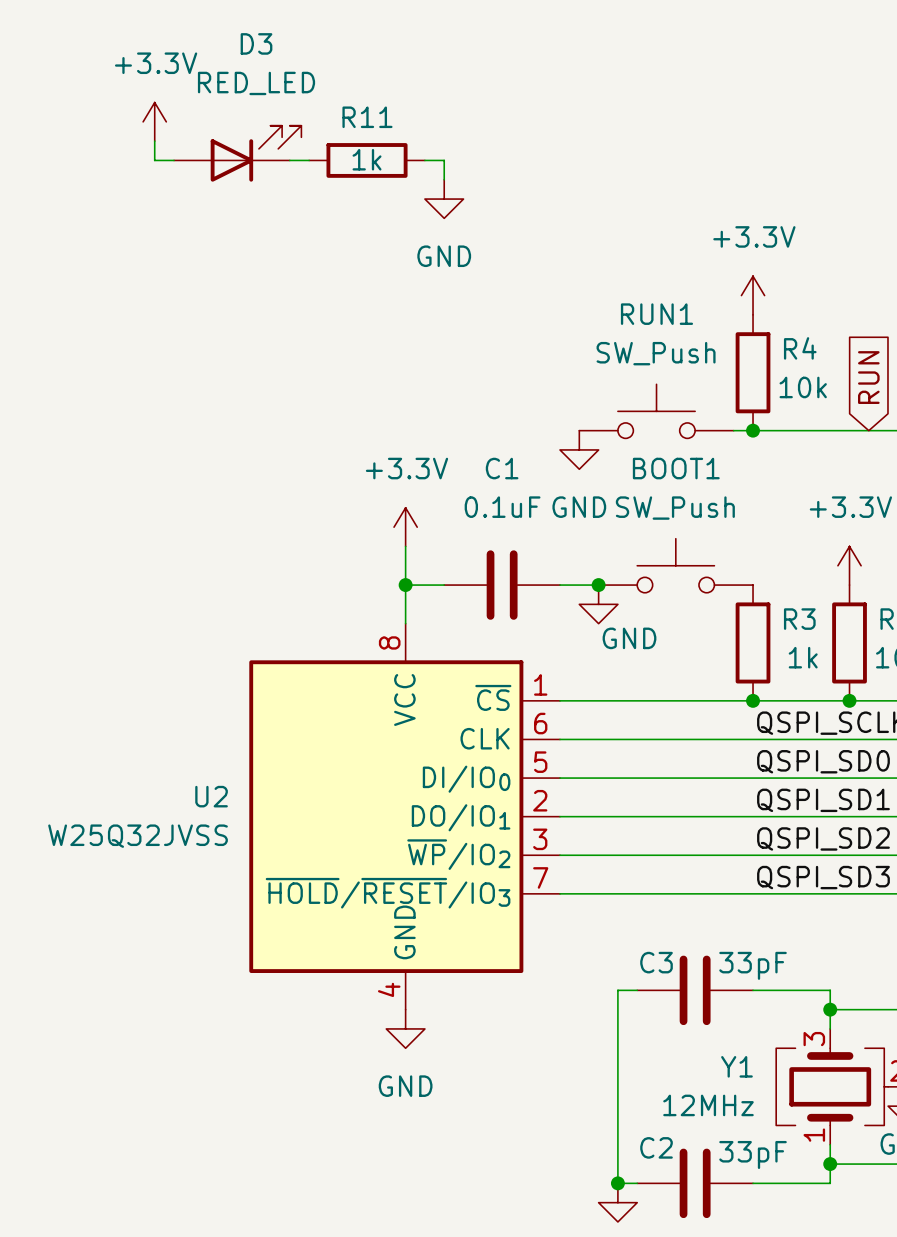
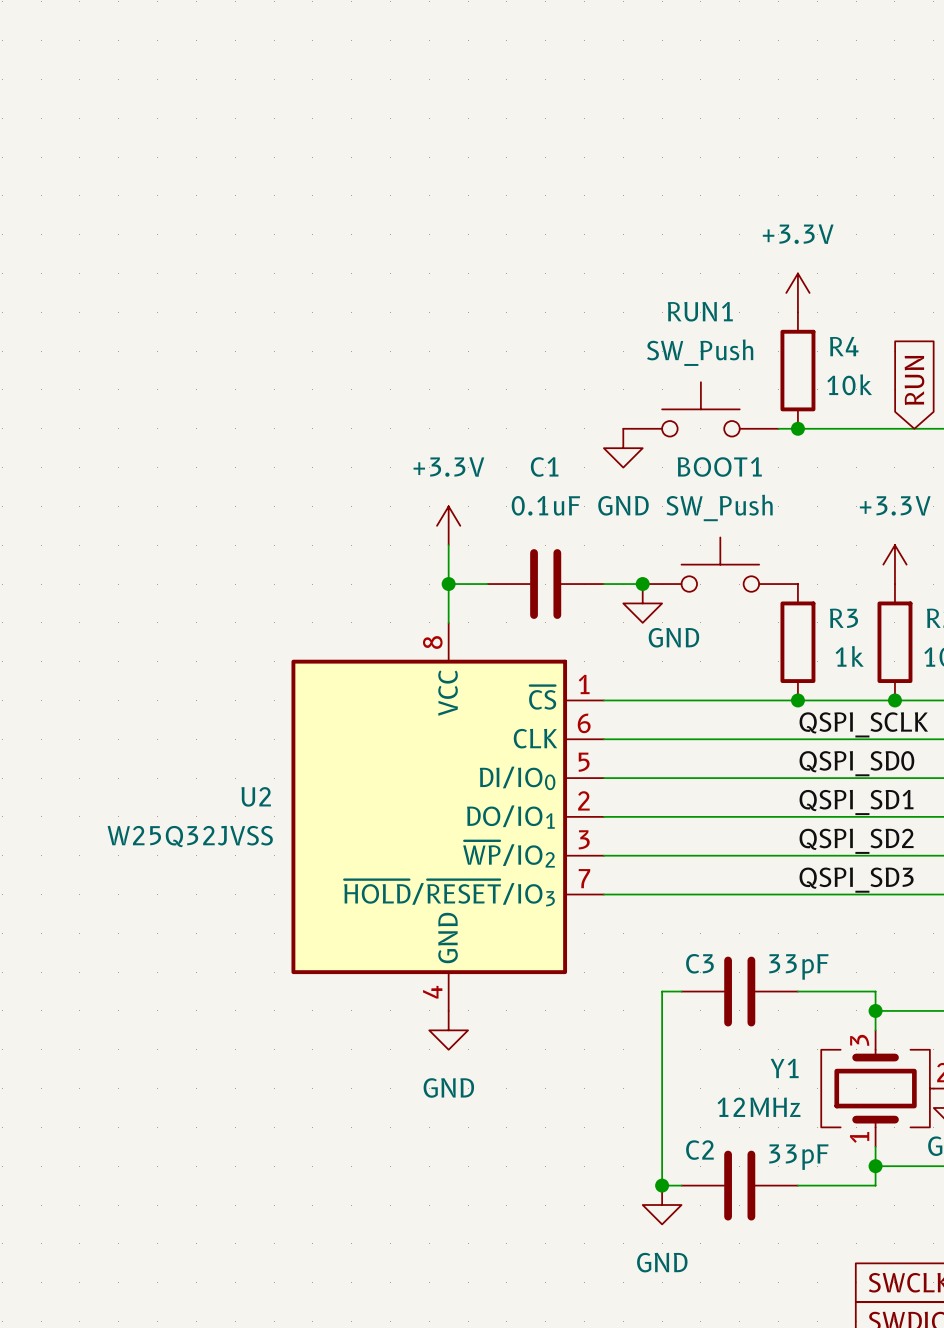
power symbol: +3.3V (154, 121) -> none
wire: (154, 141) (154, 160) (174, 160) -> none
D3: RED_LED (237, 153) -> none
wire: (289, 160) (309, 160) -> none
R11: 1k (367, 160) -> none
wire: (424, 160) (444, 160) (444, 179) -> none
power symbol: GND (444, 199) -> none

